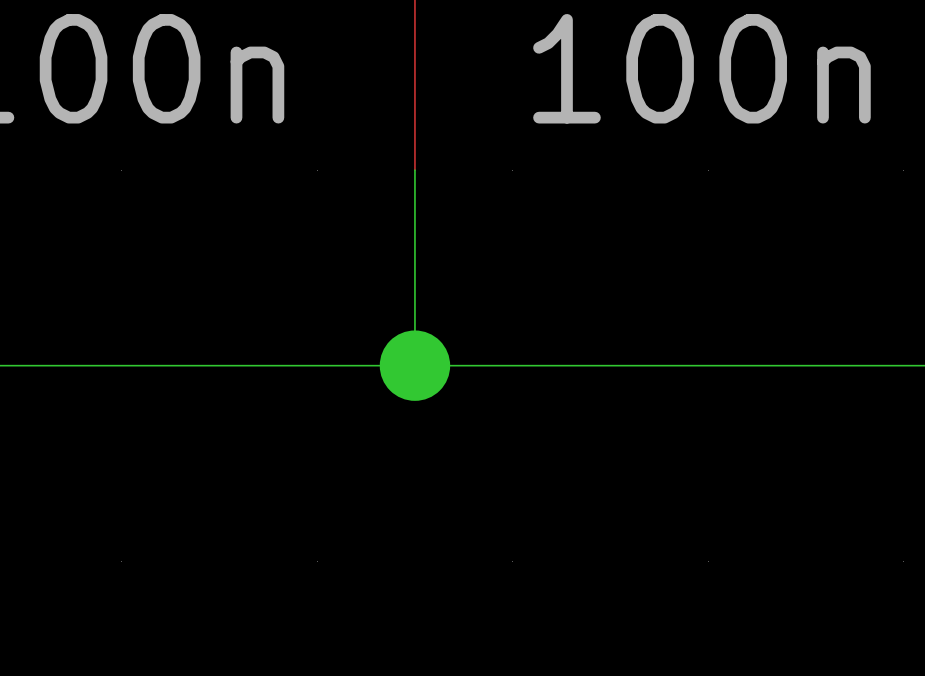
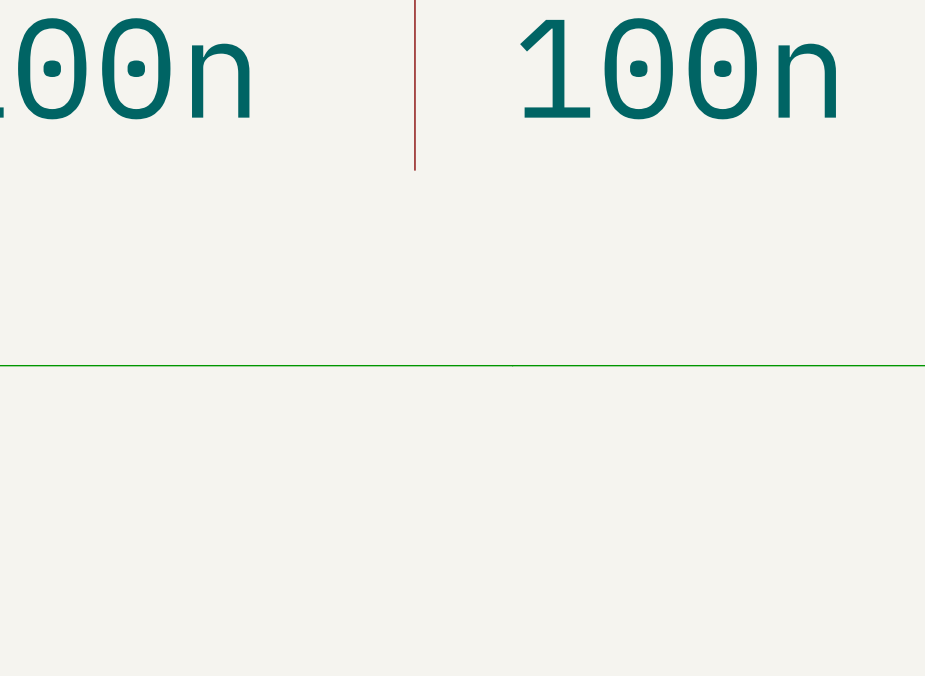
wire: (414, 170) (414, 365) -> none
junction: (414, 365) -> none

